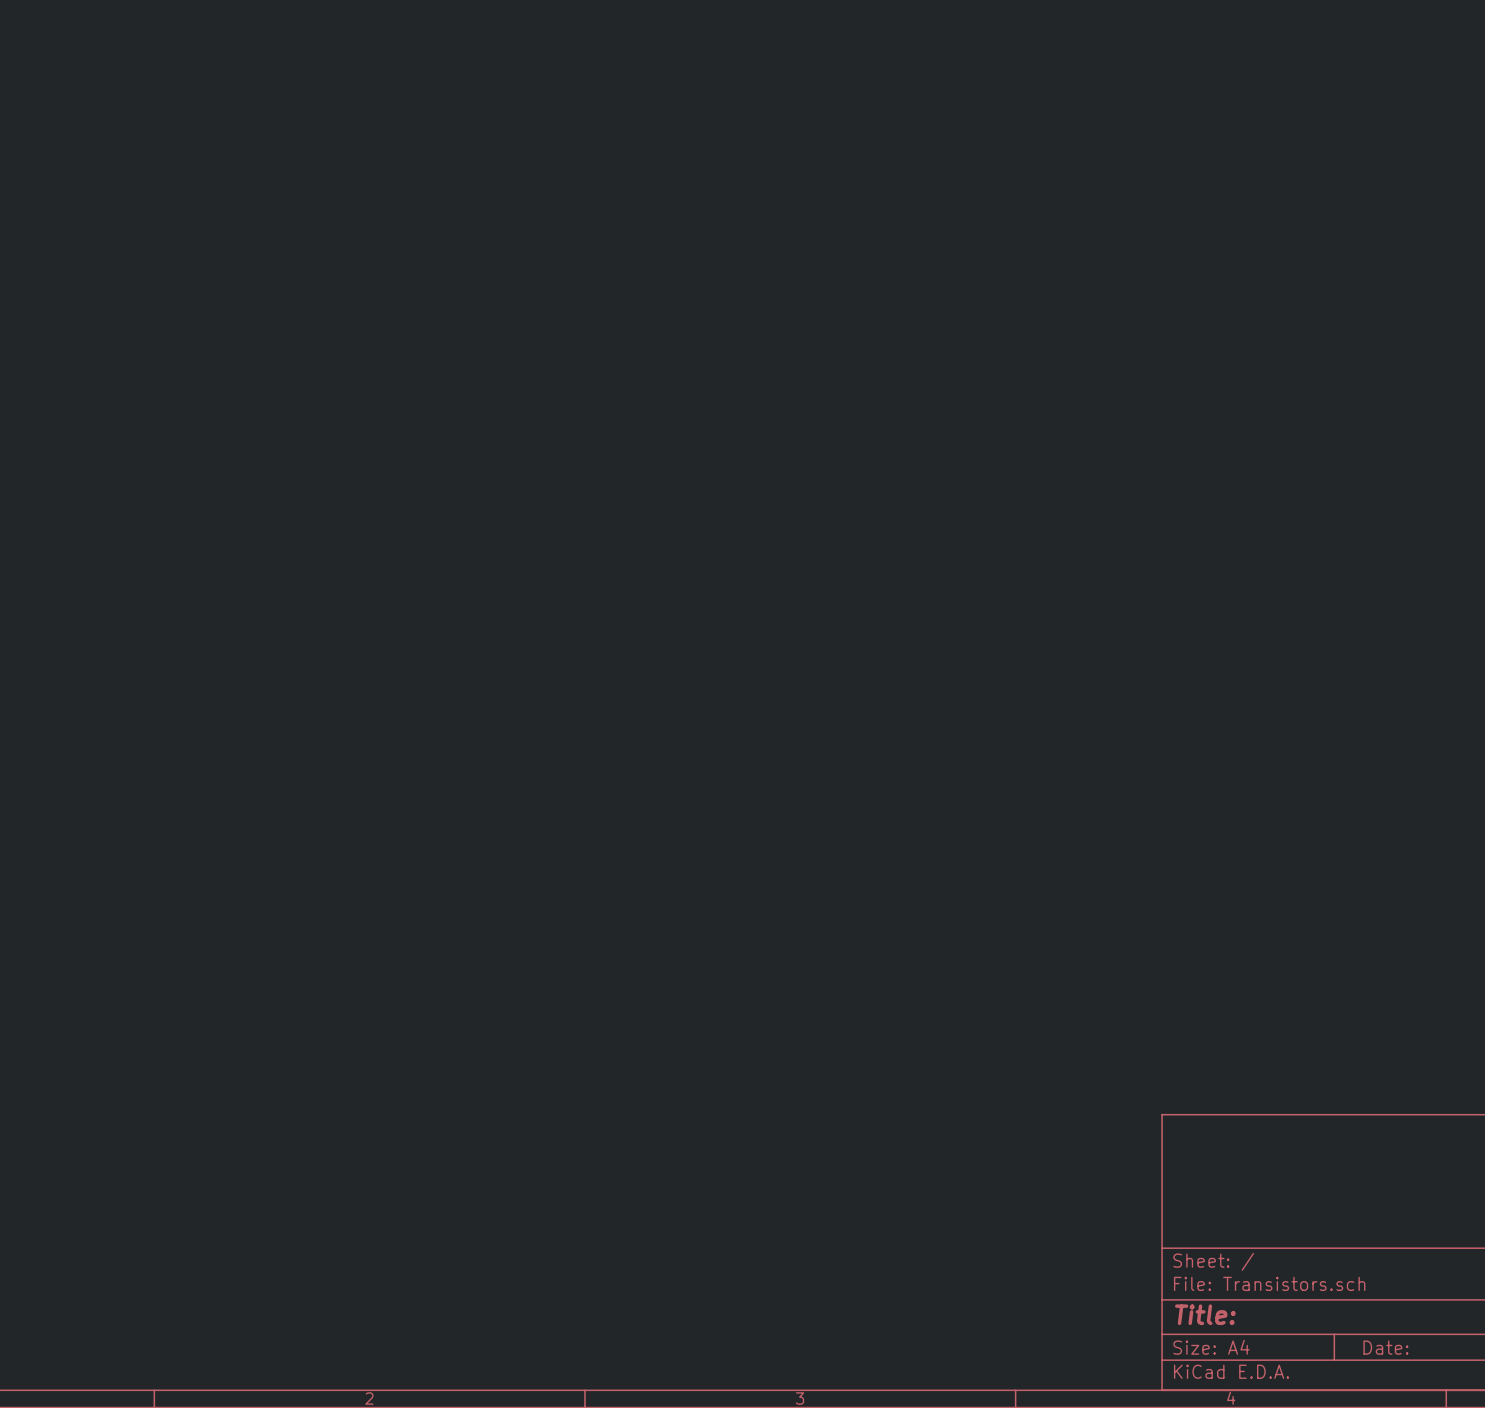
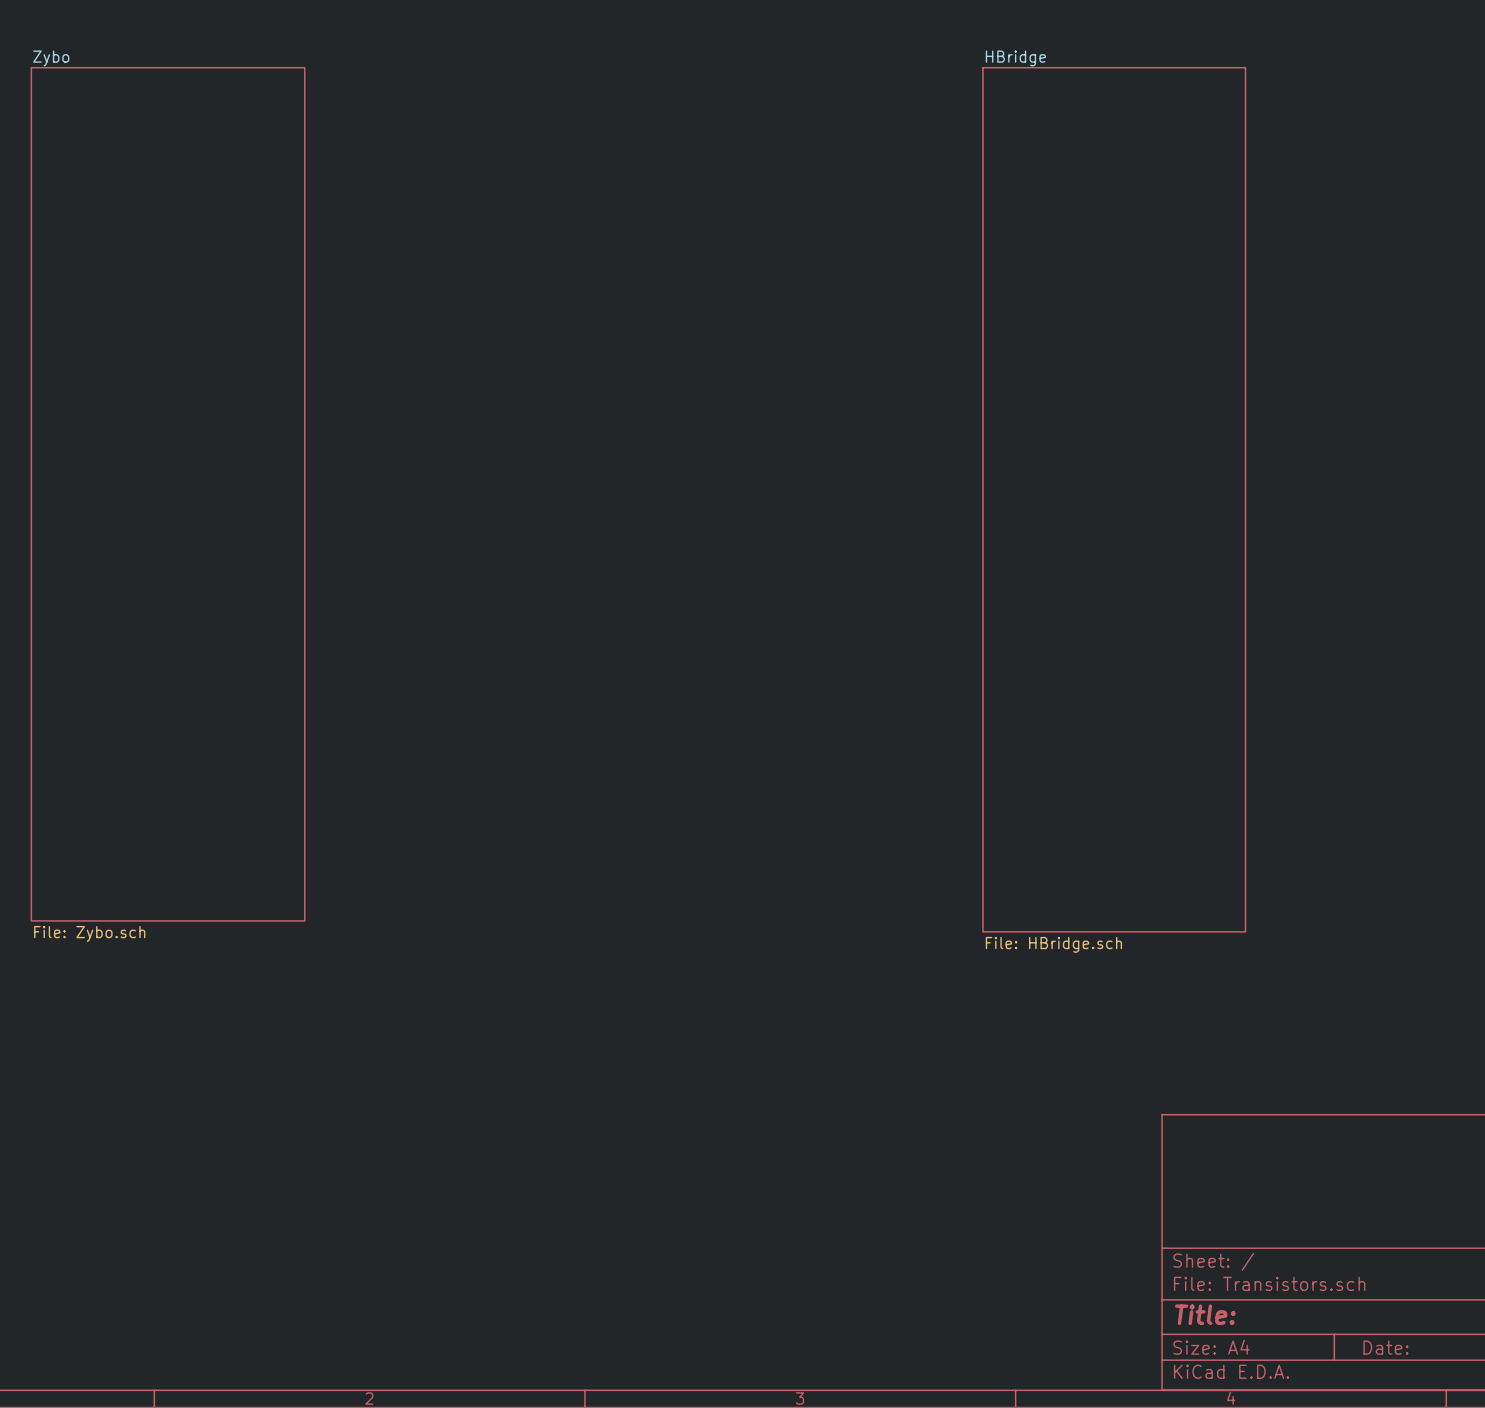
sheet Zybo: none -> File: Zybo.sch (168, 494)
sheet HBridge: none -> File: HBridge.sch (1114, 499)

